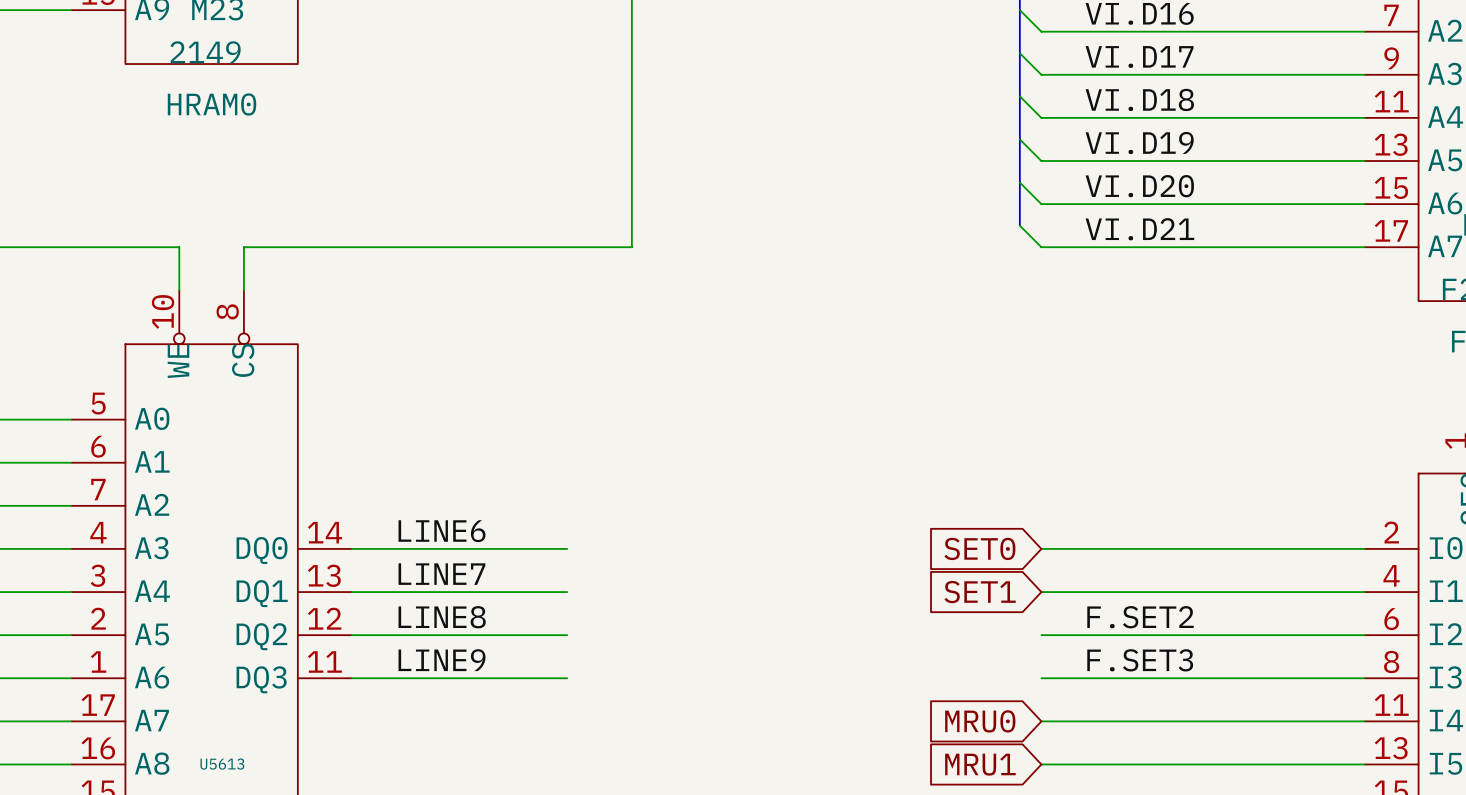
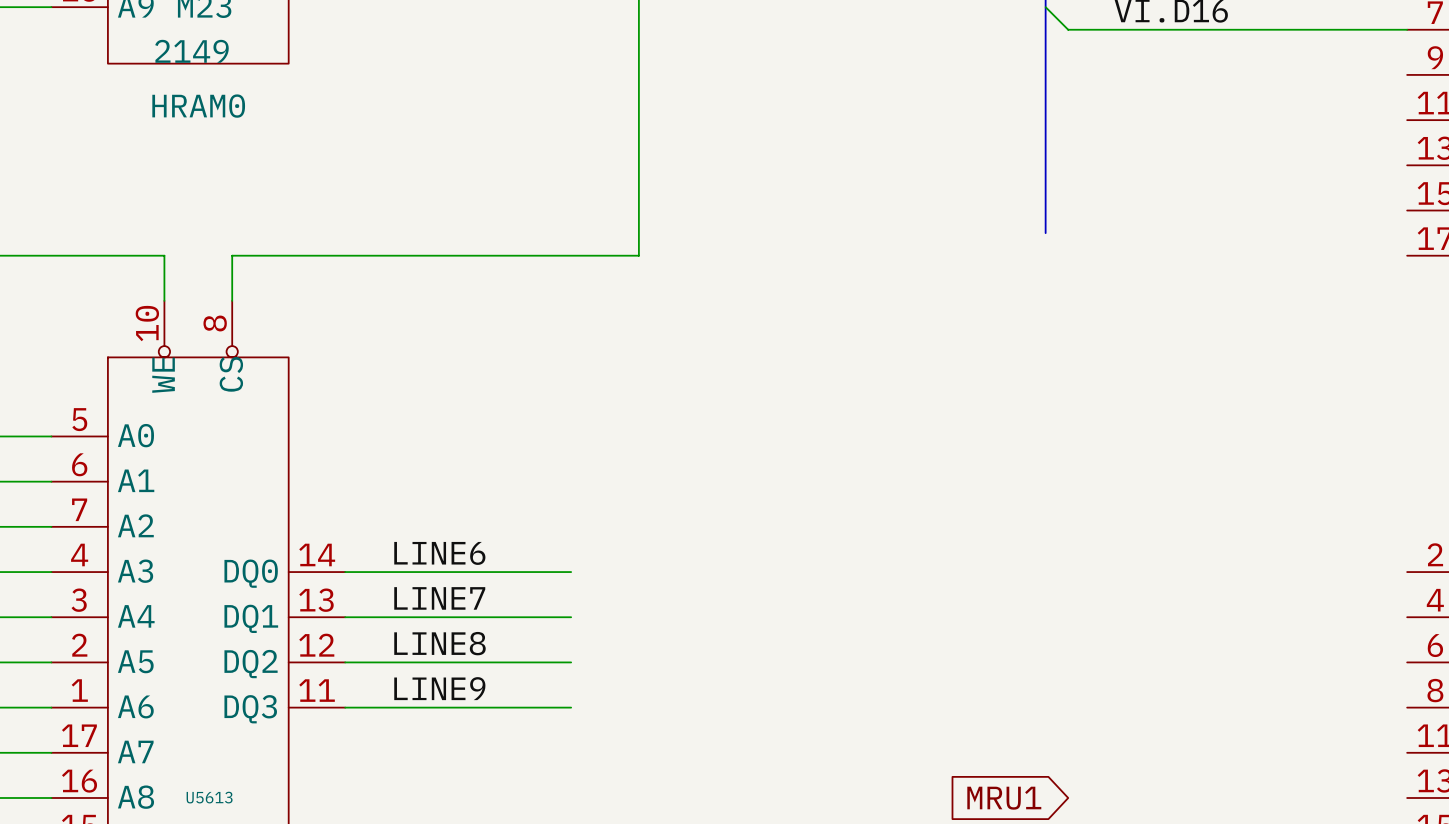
wire: (1019, 53) (1041, 74) (1364, 74) -> none
label: VI.D17 (1139, 56) -> none
wire: (1019, 96) (1041, 117) (1364, 117) -> none
label: VI.D18 (1139, 99) -> none
wire: (1019, 139) (1041, 161) (1364, 161) -> none
label: VI.D19 (1139, 143) -> none
wire: (1019, 182) (1041, 204) (1364, 204) -> none
label: VI.D20 (1139, 186) -> none
wire: (1019, 225) (1041, 247) (1364, 247) -> none
label: VI.D21 (1139, 229) -> none
global label: SET0 (979, 548) -> none
wire: (1041, 548) (1364, 548) -> none
global label: SET1 (980, 592) -> none
wire: (1041, 592) (1364, 592) -> none
label: F.SET2 (1140, 617) -> none
wire: (1041, 635) (1364, 635) -> none
label: F.SET3 (1140, 660) -> none
wire: (1041, 678) (1364, 678) -> none
global label: MRU0 (980, 721) -> none
wire: (1041, 721) (1364, 721) -> none
wire: (1041, 764) (1364, 764) -> none

